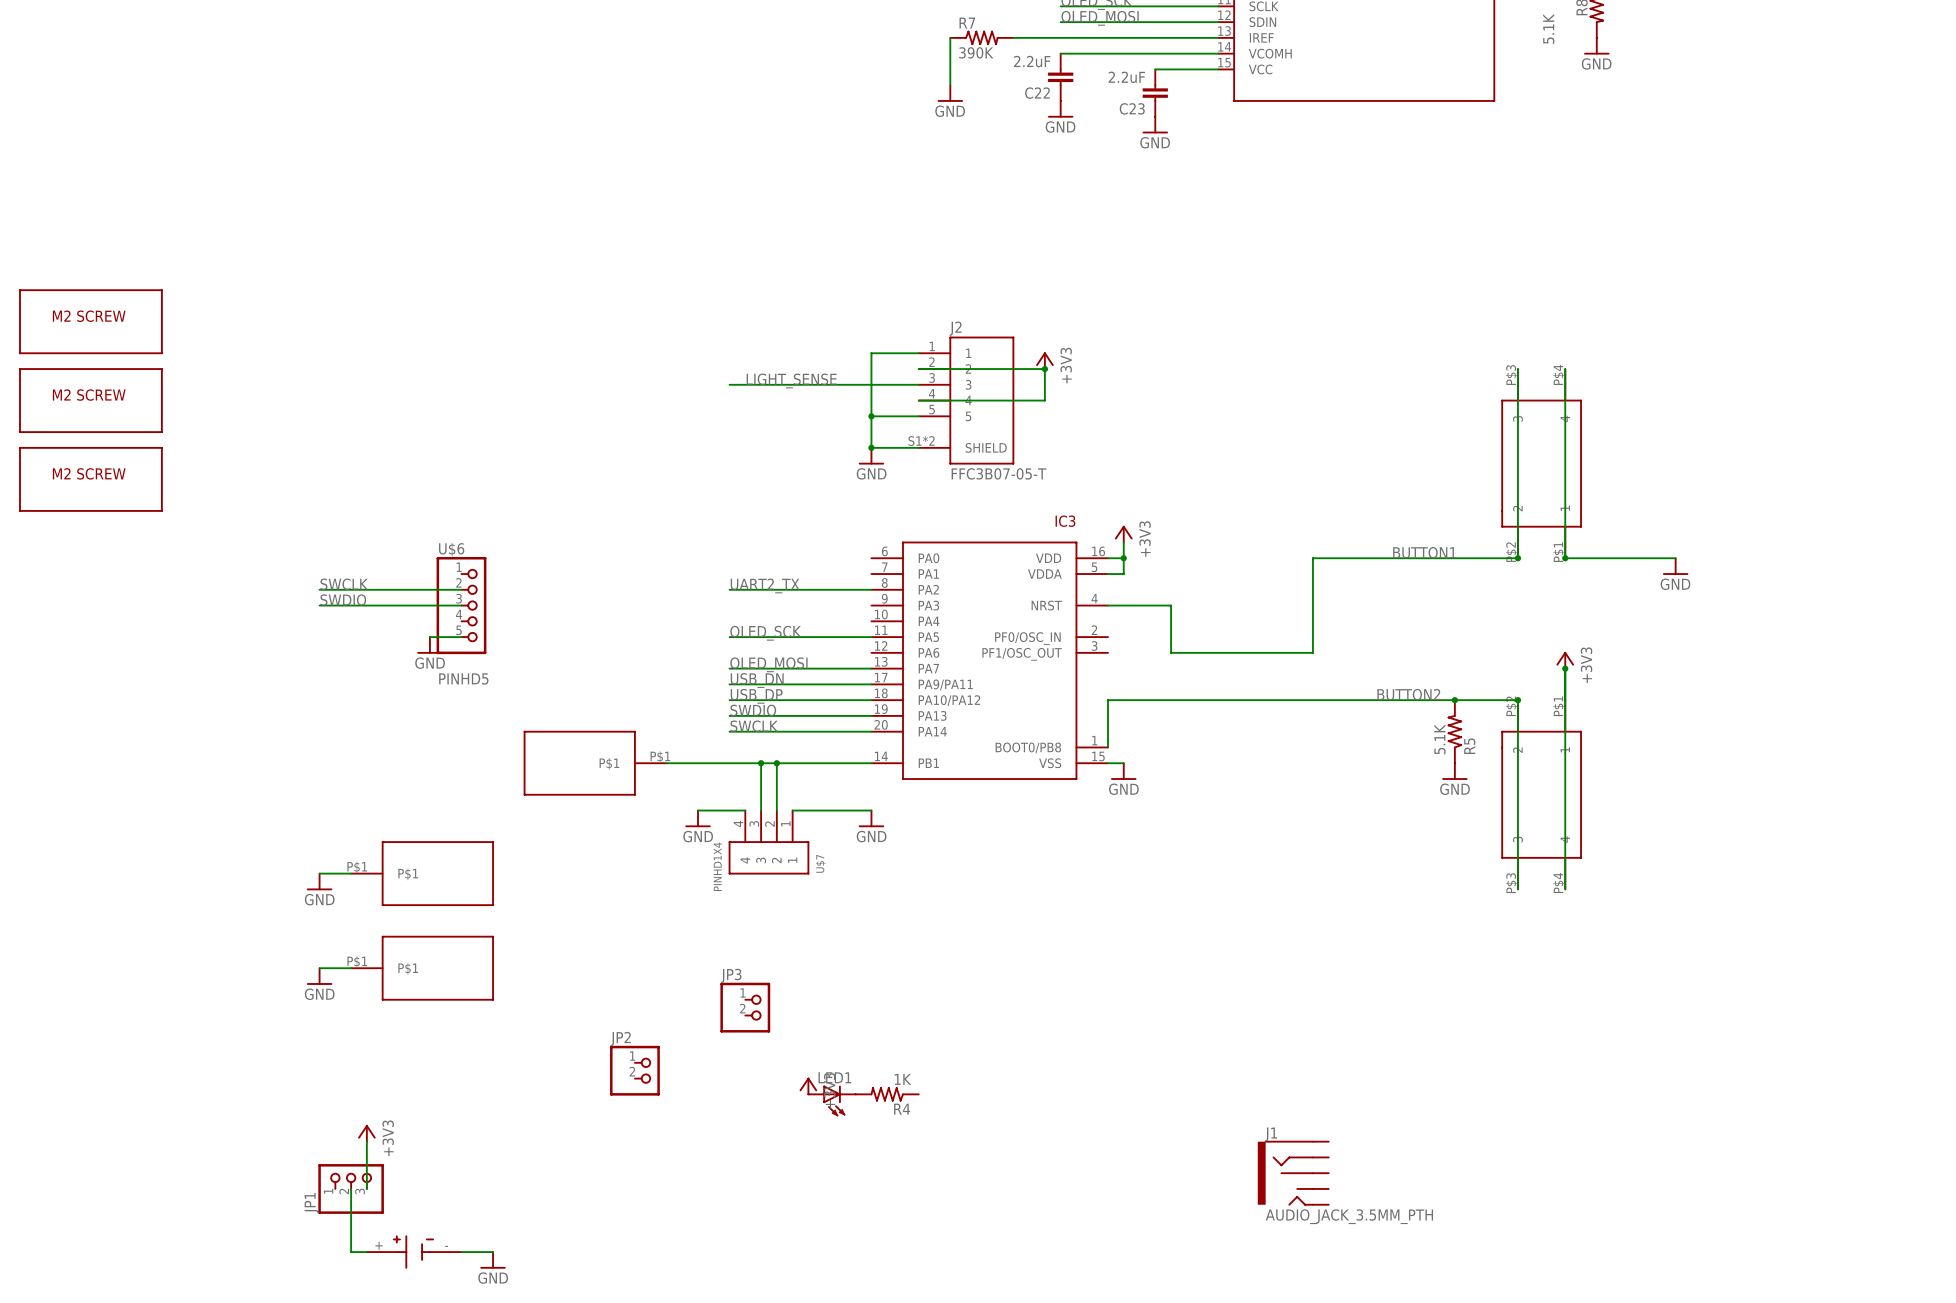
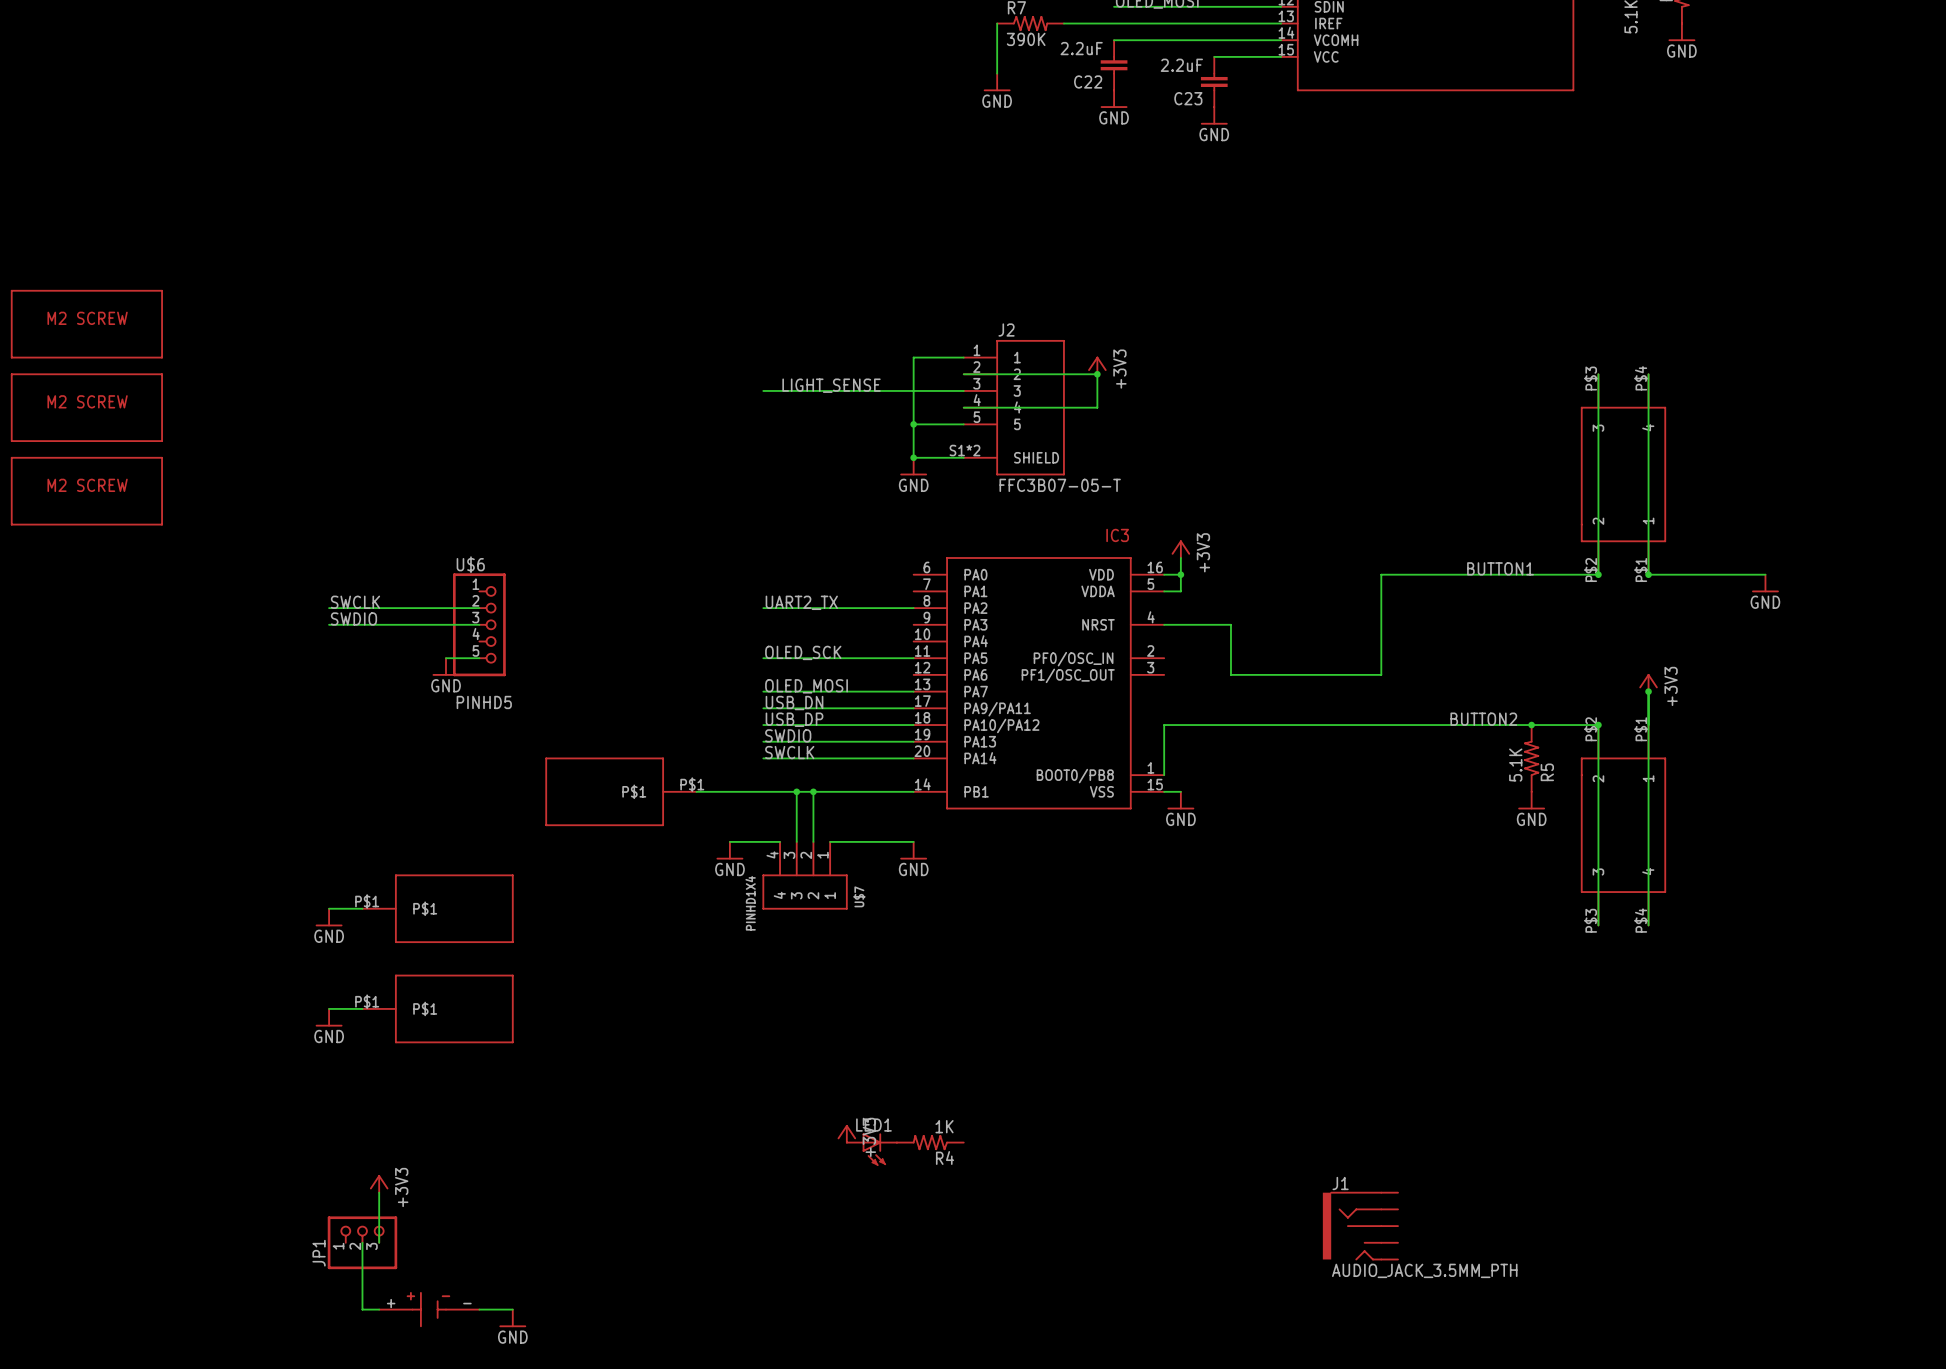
JP3: (745, 1007) -> none
JP2: (634, 1070) -> none

